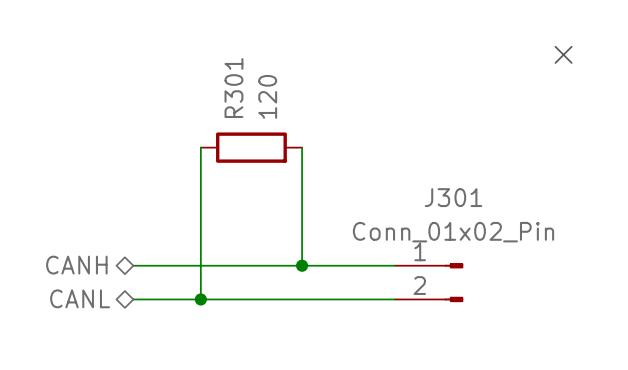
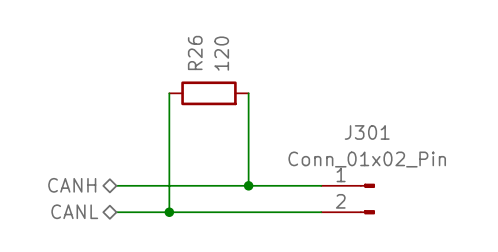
no-connect mark: (563, 54) -> none
R301 name: R301 (233, 88) -> R26 (195, 52)

